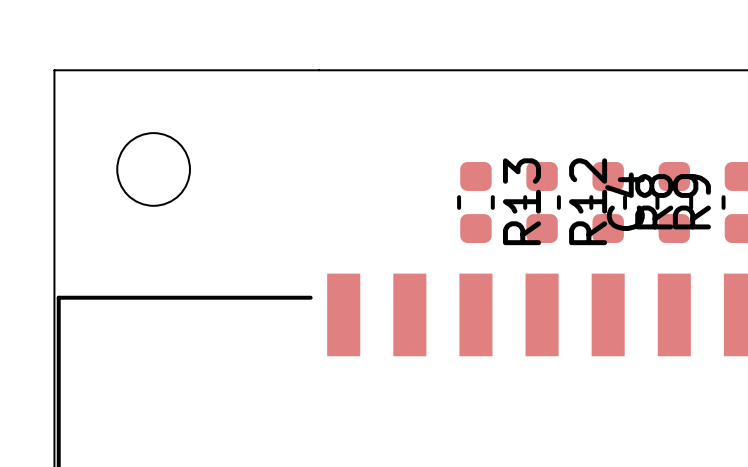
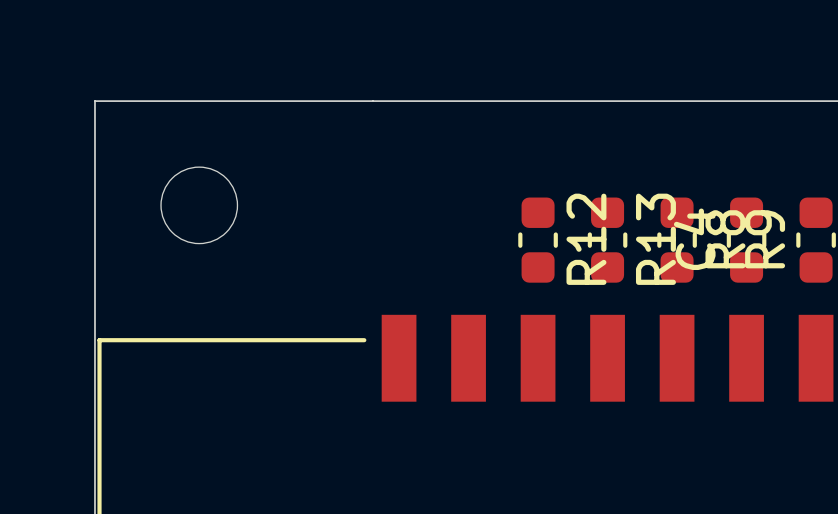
R13 name: R13 (521, 201) -> R12 (586, 239)
R12 name: R12 (588, 201) -> R13 (655, 239)

